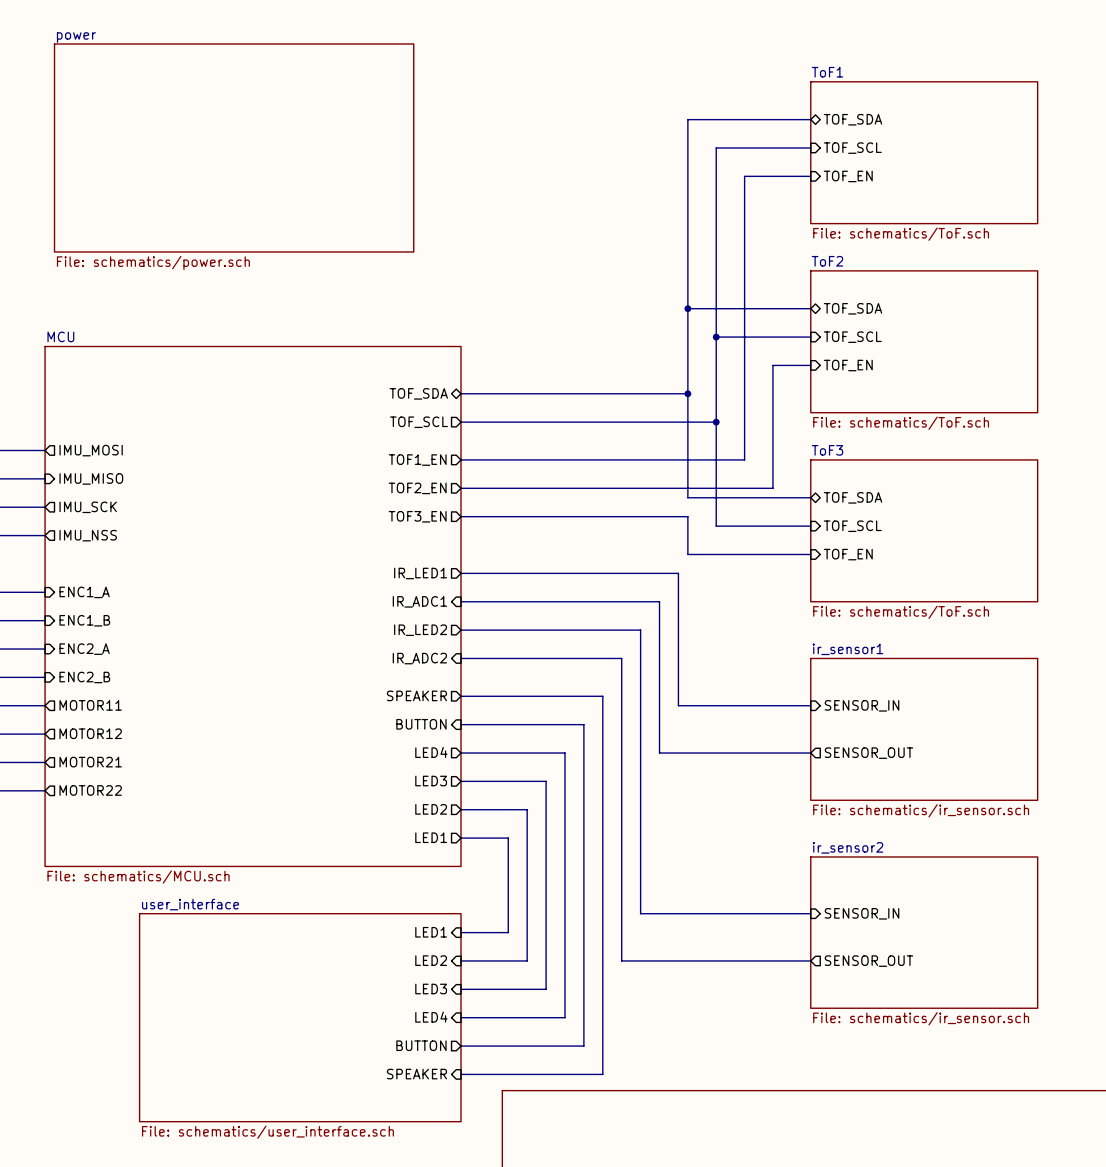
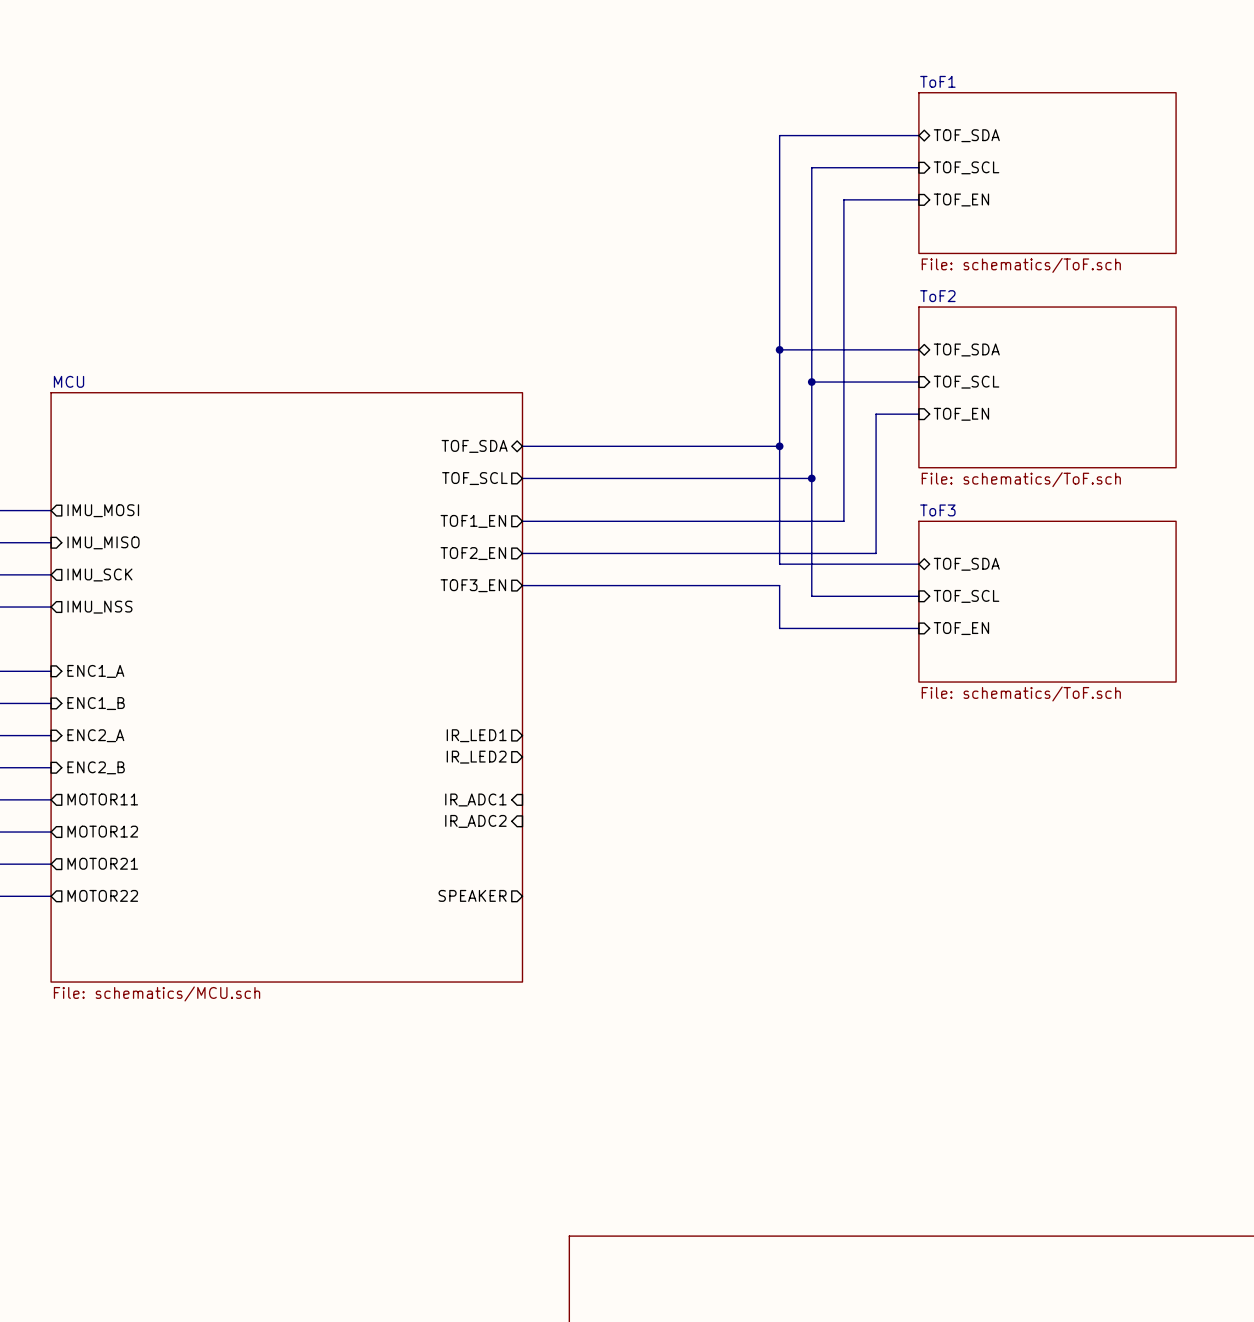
sheet power: File: schematics/power.sch (234, 147) -> none
sheet pin position: IR_LED1 (420, 573) -> IR_LED1 (476, 735)
wire: (461, 573) (678, 573) (678, 705) (810, 705) -> none
sheet pin position: IR_ADC1 (419, 601) -> IR_ADC1 (475, 799)
wire: (461, 601) (659, 601) (659, 753) (810, 753) -> none
sheet pin position: IR_LED2 (420, 630) -> IR_LED2 (476, 757)
wire: (461, 630) (640, 630) (640, 913) (810, 913) -> none
sheet pin: IR_ADC2 (419, 658) -> none
wire: (461, 658) (621, 658) (621, 960) (810, 960) -> none
sheet pin position: SPEAKER (416, 695) -> SPEAKER (472, 895)
wire: (461, 696) (602, 696) (602, 1074) (461, 1074) -> none
sheet pin: SENSOR_IN (862, 705) -> none
sheet pin: BUTTON (421, 724) -> IR_ADC2 (475, 821)
wire: (461, 724) (583, 724) (583, 1046) (461, 1046) -> none
sheet ir_sensor1: File: schematics/ir_sensor.sch (924, 729) -> none
sheet pin: LED4 (431, 752) -> none
wire: (461, 753) (564, 753) (564, 1017) (461, 1017) -> none
sheet pin: SENSOR_OUT (868, 753) -> none
sheet pin: LED3 (431, 781) -> none
wire: (461, 781) (546, 781) (546, 989) (461, 989) -> none
sheet pin: LED2 (431, 809) -> none
wire: (461, 809) (527, 809) (527, 960) (461, 960) -> none
sheet pin: LED1 (431, 837) -> none
wire: (461, 838) (508, 838) (508, 932) (461, 932) -> none
sheet pin: SENSOR_IN (862, 913) -> none
sheet pin: LED1 (431, 932) -> none
sheet ir_sensor2: File: schematics/ir_sensor.sch (924, 932) -> none
sheet pin: LED2 (431, 960) -> none
sheet pin: SENSOR_OUT (868, 961) -> none
sheet pin: LED3 (431, 988) -> none
sheet user_interface: File: schematics/user_interface.sch (300, 1017) -> none
sheet pin: LED4 (431, 1017) -> none
sheet pin: BUTTON (421, 1045) -> none
sheet pin: SPEAKER (416, 1074) -> none

